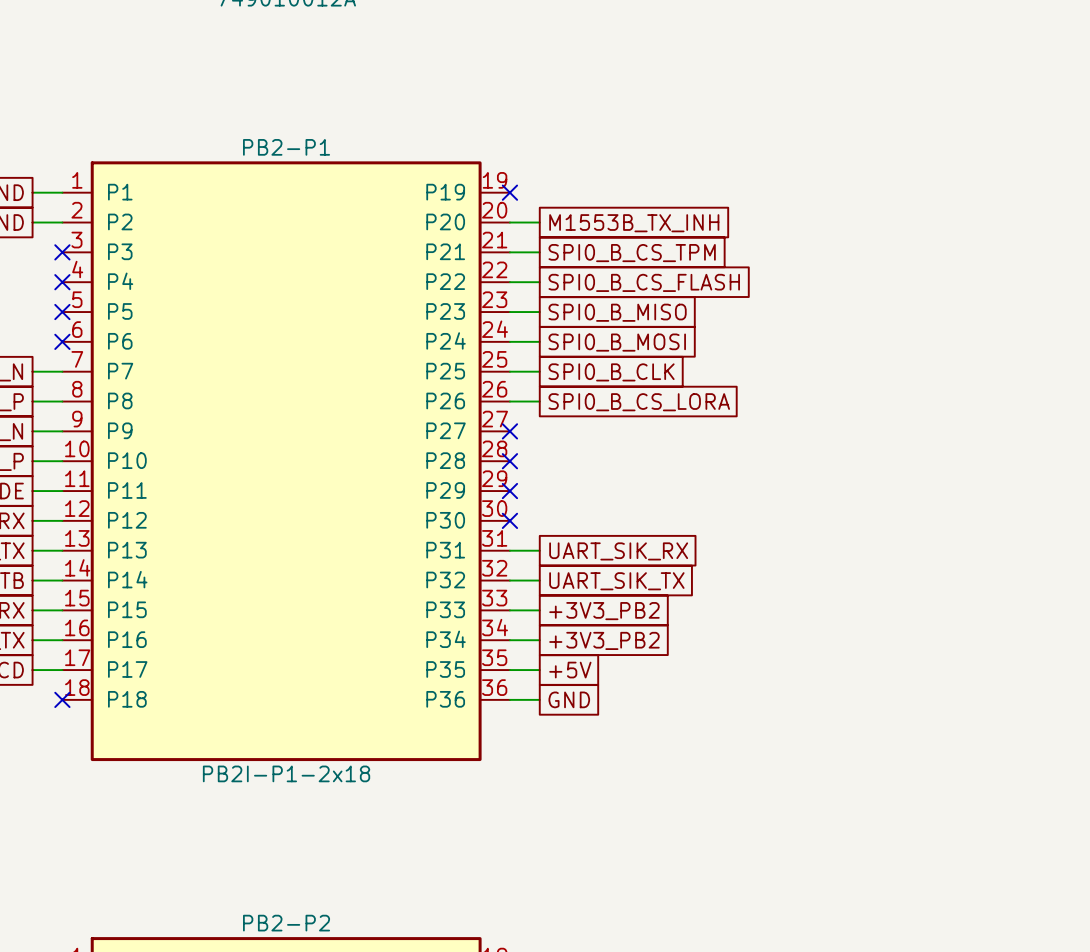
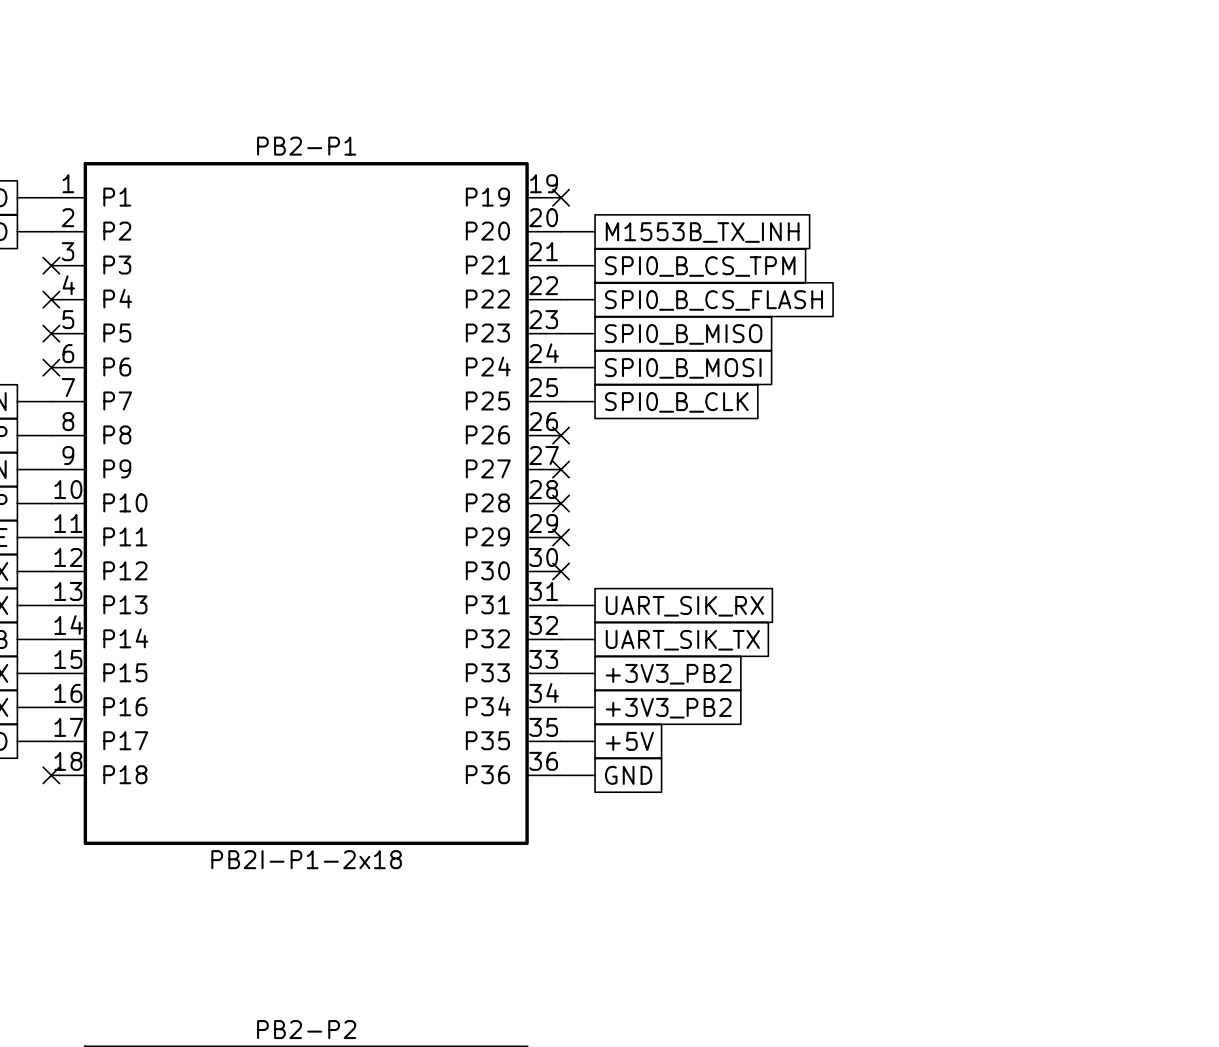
wire: (509, 401) (539, 401) -> none
no-connect mark: none -> (561, 435)
global label: SPI0_B_CS_LORA (639, 402) -> none

